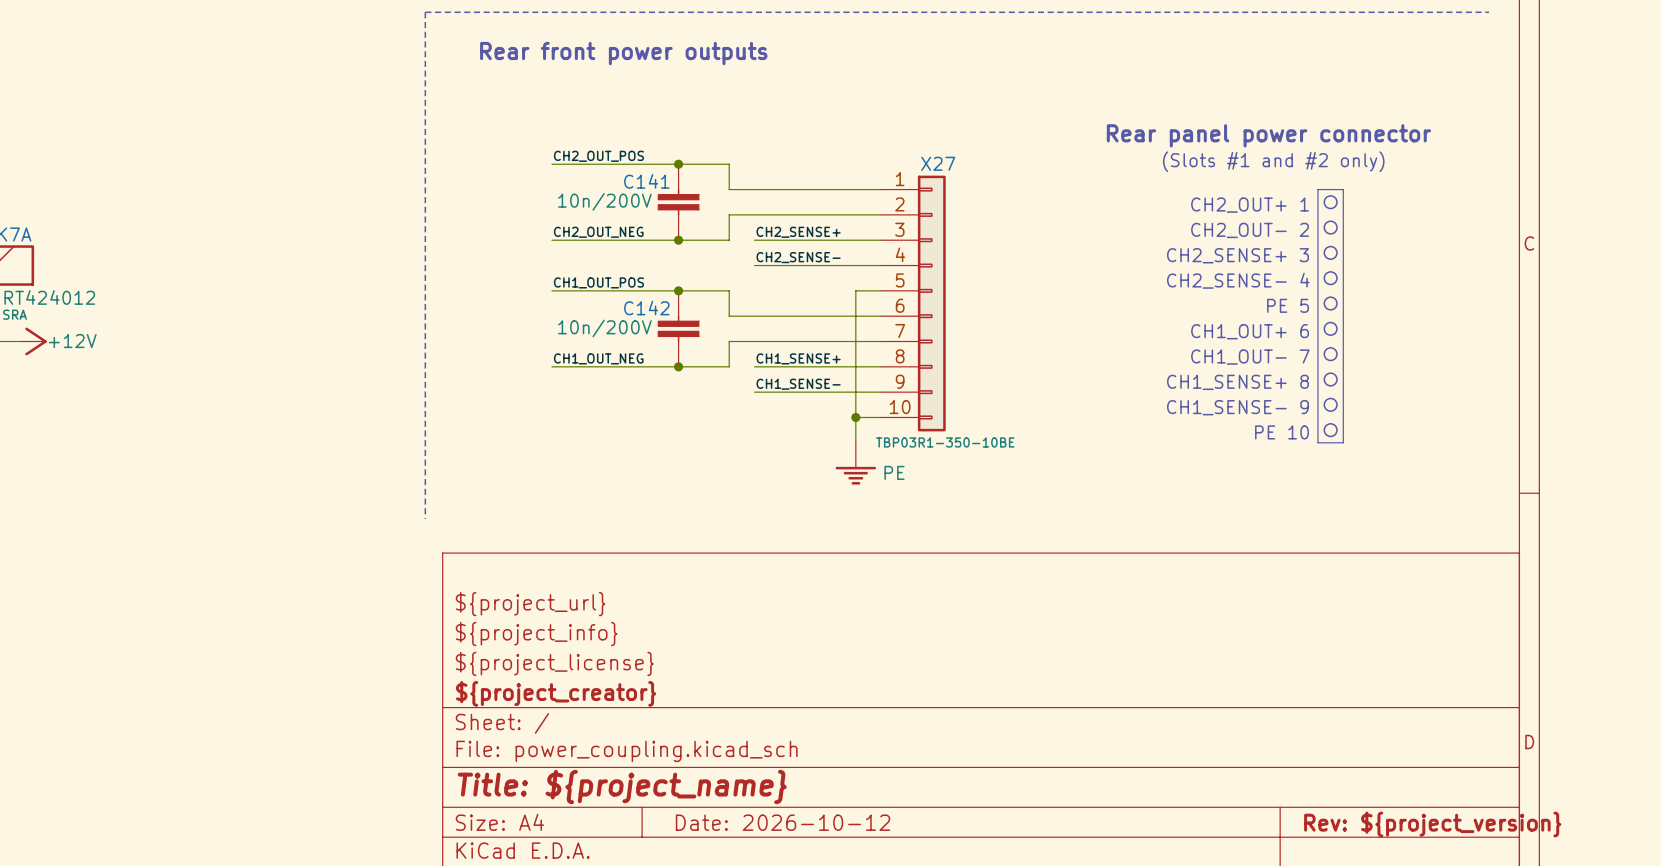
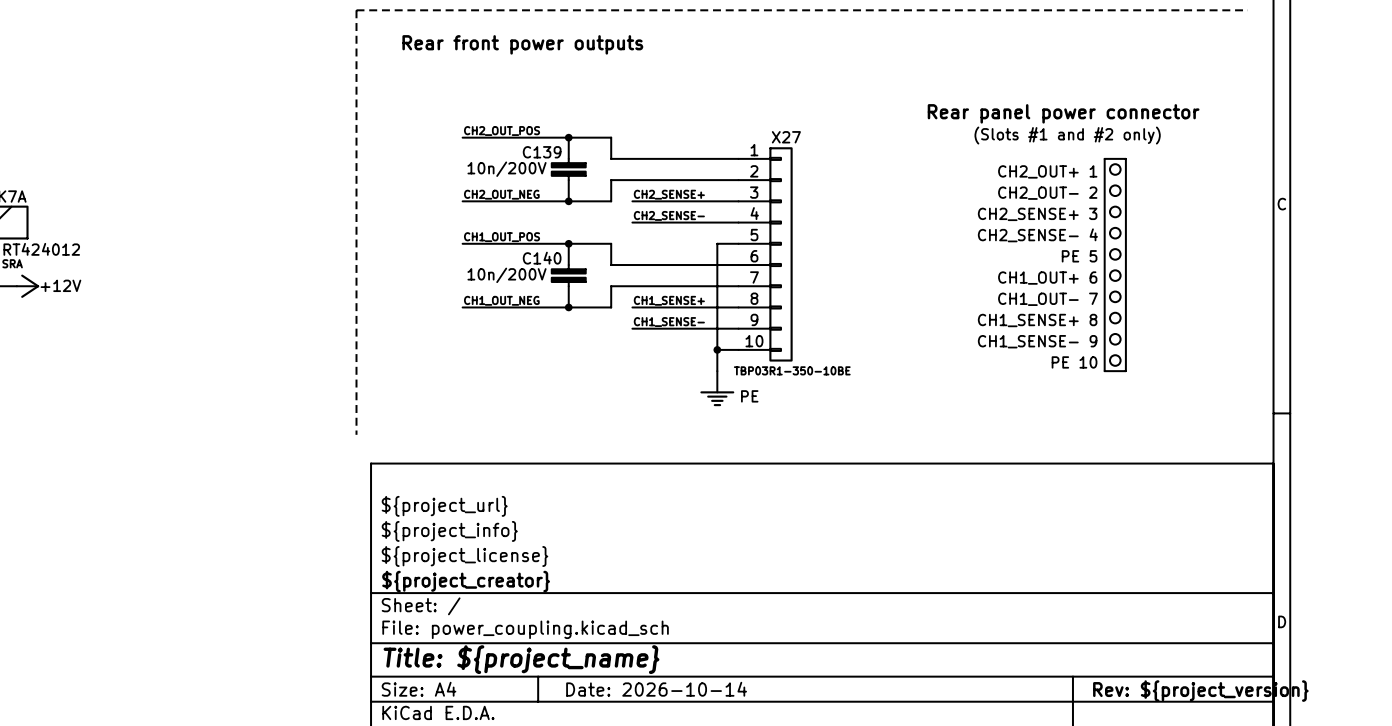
C141 name: C141 (646, 181) -> C139 (542, 152)
C142 name: C142 (646, 308) -> C140 (542, 258)
title block: Date: 2026-10-12 (783, 822) -> Date: 2026-10-14 (656, 689)

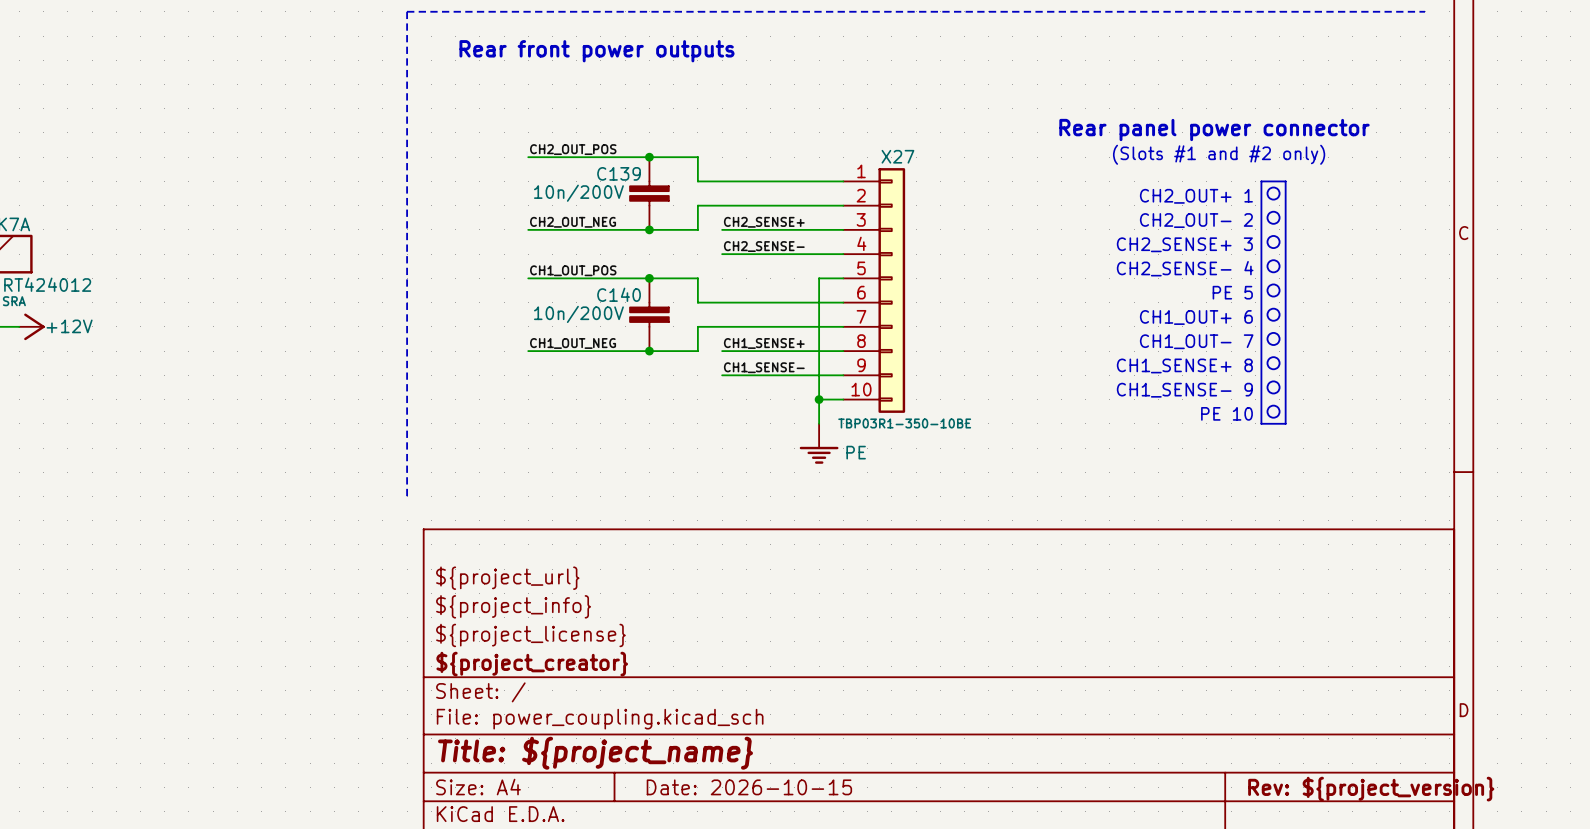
title block: Date: 2026-10-14 (656, 689) -> Date: 2026-10-15 (749, 787)

